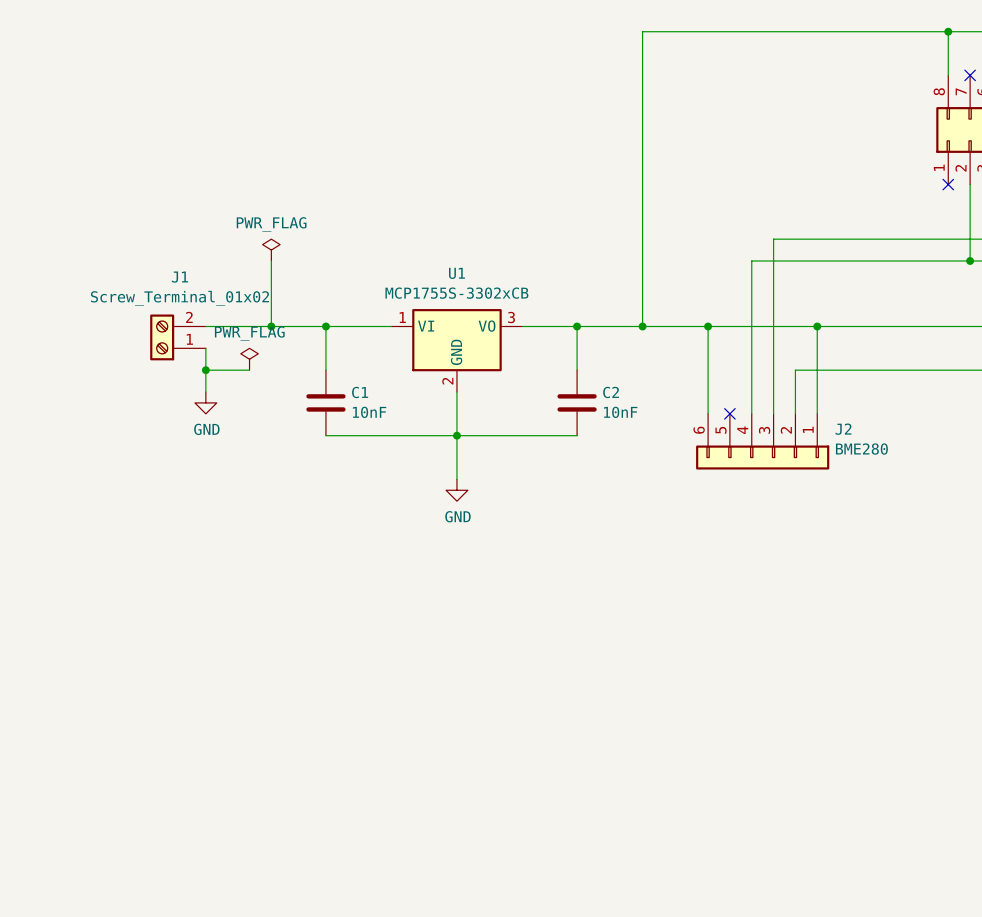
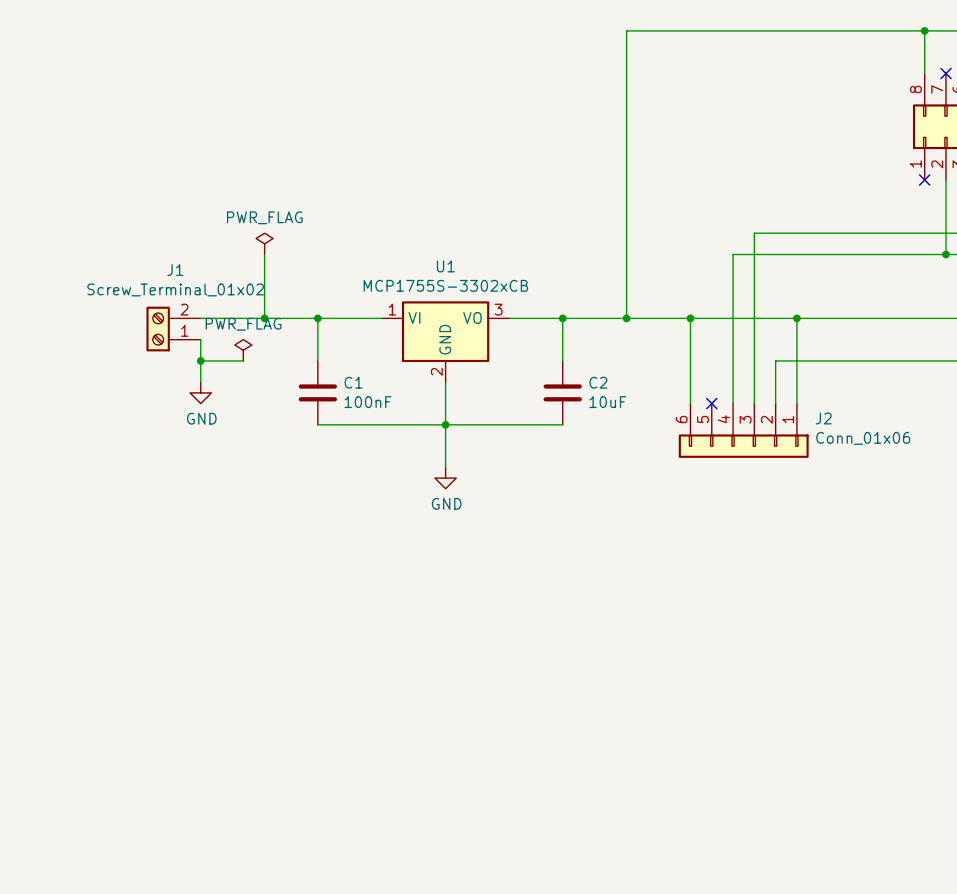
C1 value: 10nF (369, 412) -> 100nF (368, 402)
C2 value: 10nF (620, 412) -> 10uF (607, 402)
J2 value: BME280 (861, 449) -> Conn_01x06 (863, 438)

